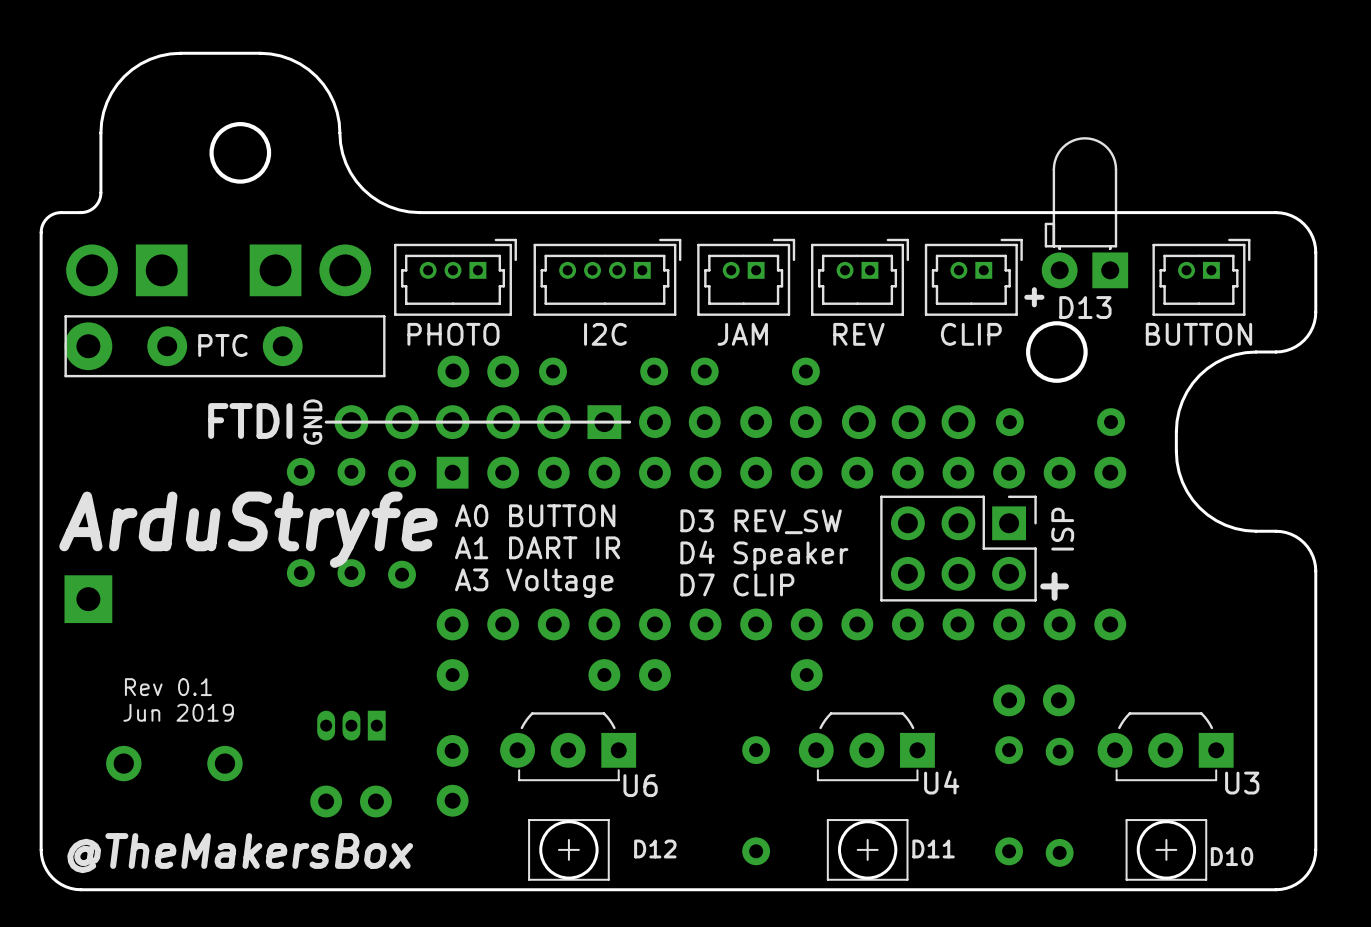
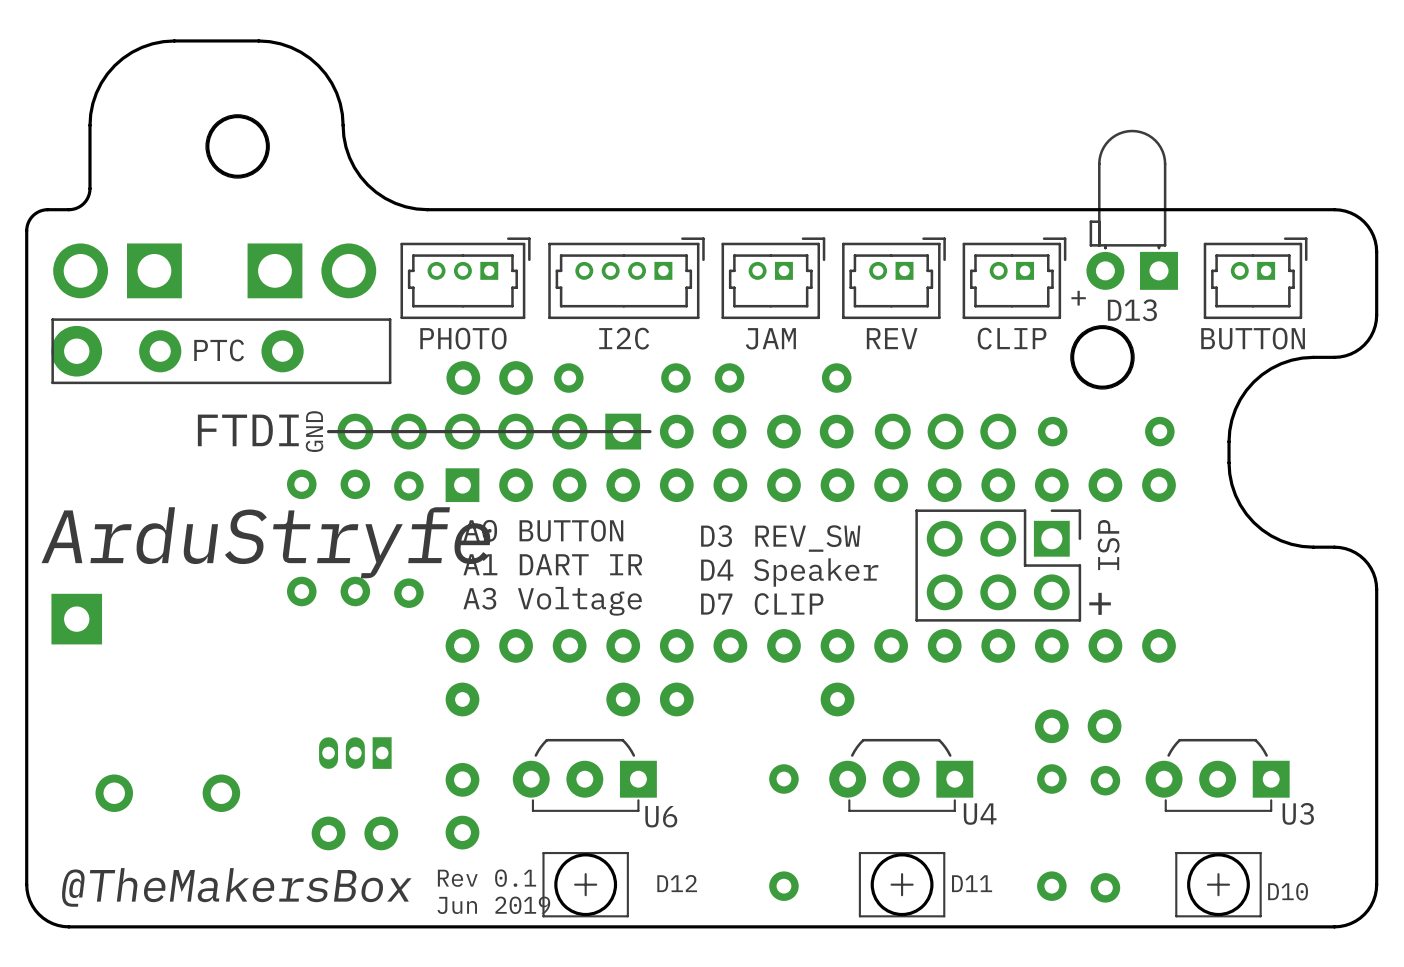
text position: Rev 0.1 (168, 687) -> Rev 0.1 (486, 878)
text position: Jun 2019 (178, 712) -> Jun 2019 (493, 905)

